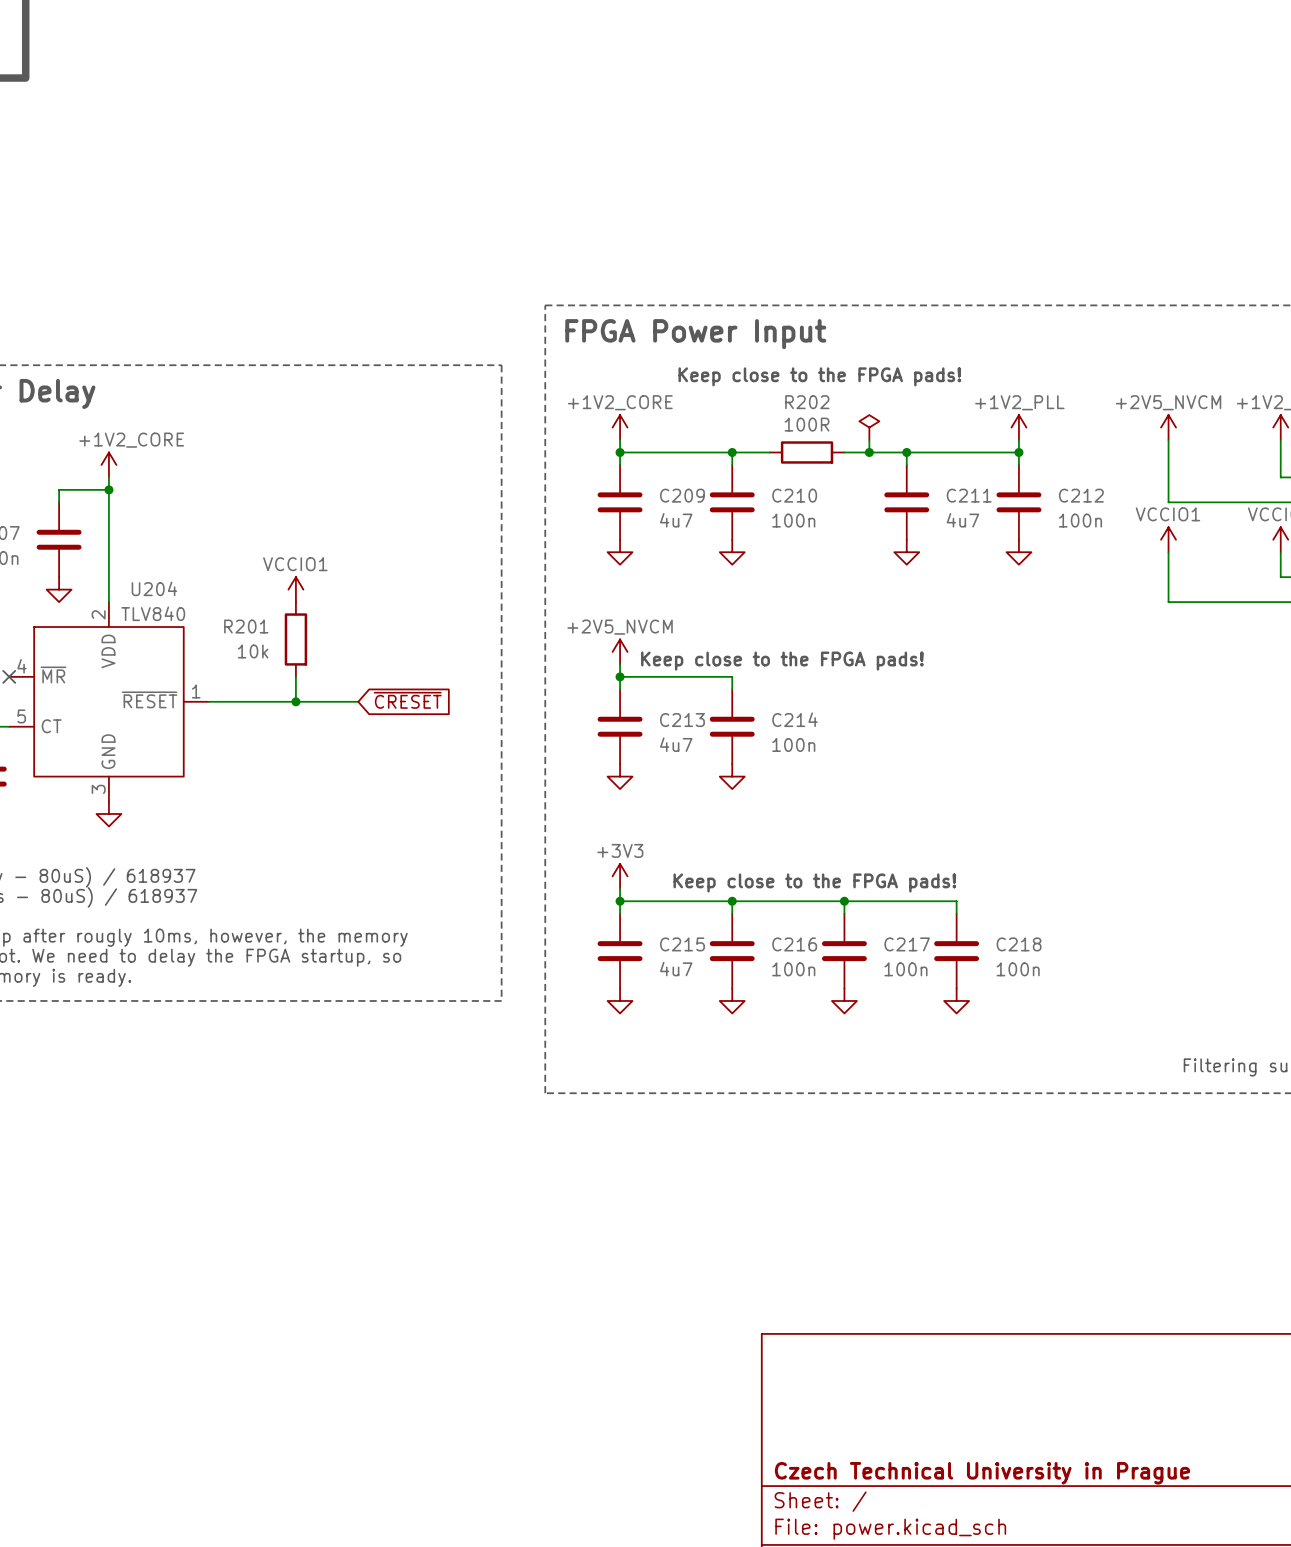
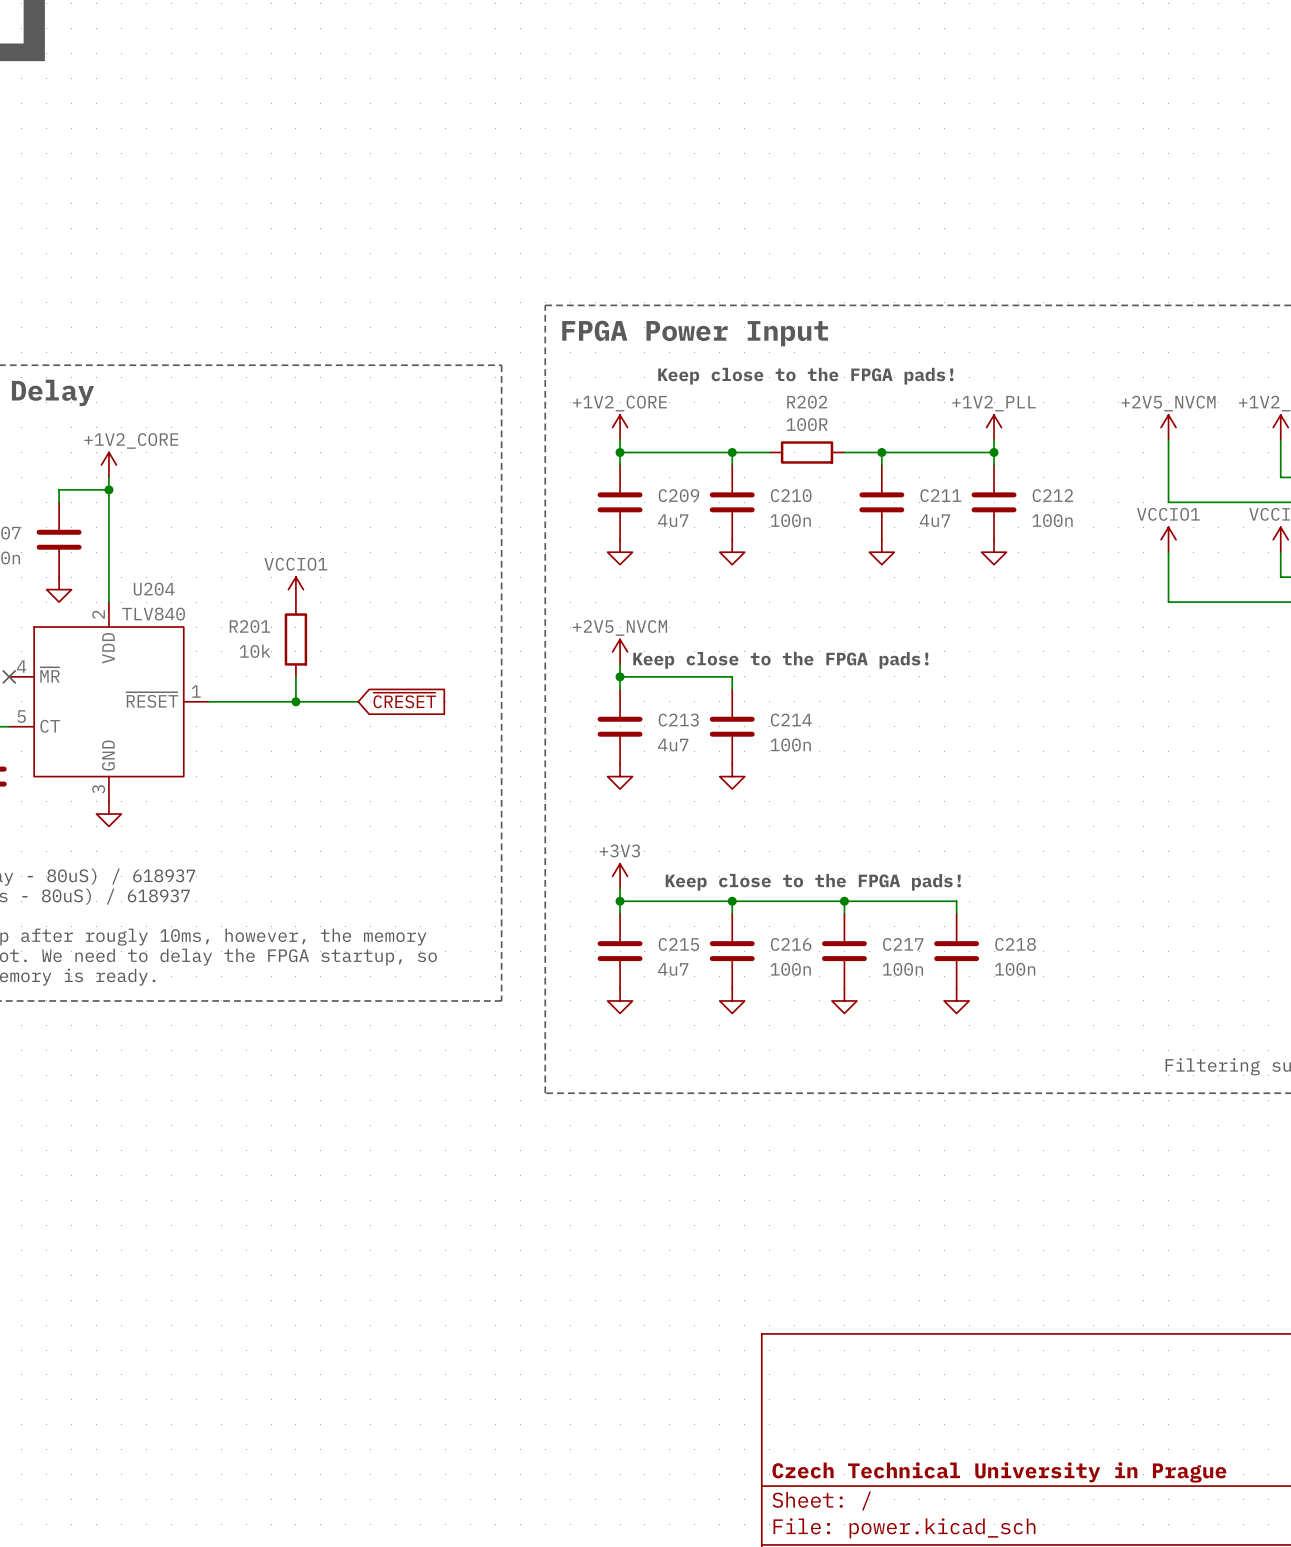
text position: Keep close to the FPGA pads! (819, 376) -> Keep close to the FPGA pads! (805, 376)
power symbol: (869, 427) -> none
power symbol position: +1V2_PLL (1018, 427) -> +1V2_PLL (994, 427)
wire: (869, 440) (869, 452) -> none
wire: (1018, 440) (1018, 464) -> (994, 440) (994, 464)
junction: (869, 452) -> none
junction: none -> (881, 452)
wire: (906, 452) (906, 464) -> (881, 452) (881, 464)
junction: (906, 452) -> none
wire: (994, 452) (1018, 452) -> none
junction position: (1018, 452) -> (994, 452)
C211 position: (906, 502) -> (881, 502)
C212 position: (1018, 502) -> (994, 502)
power symbol position: (906, 552) -> (881, 552)
power symbol position: (1018, 552) -> (994, 552)

